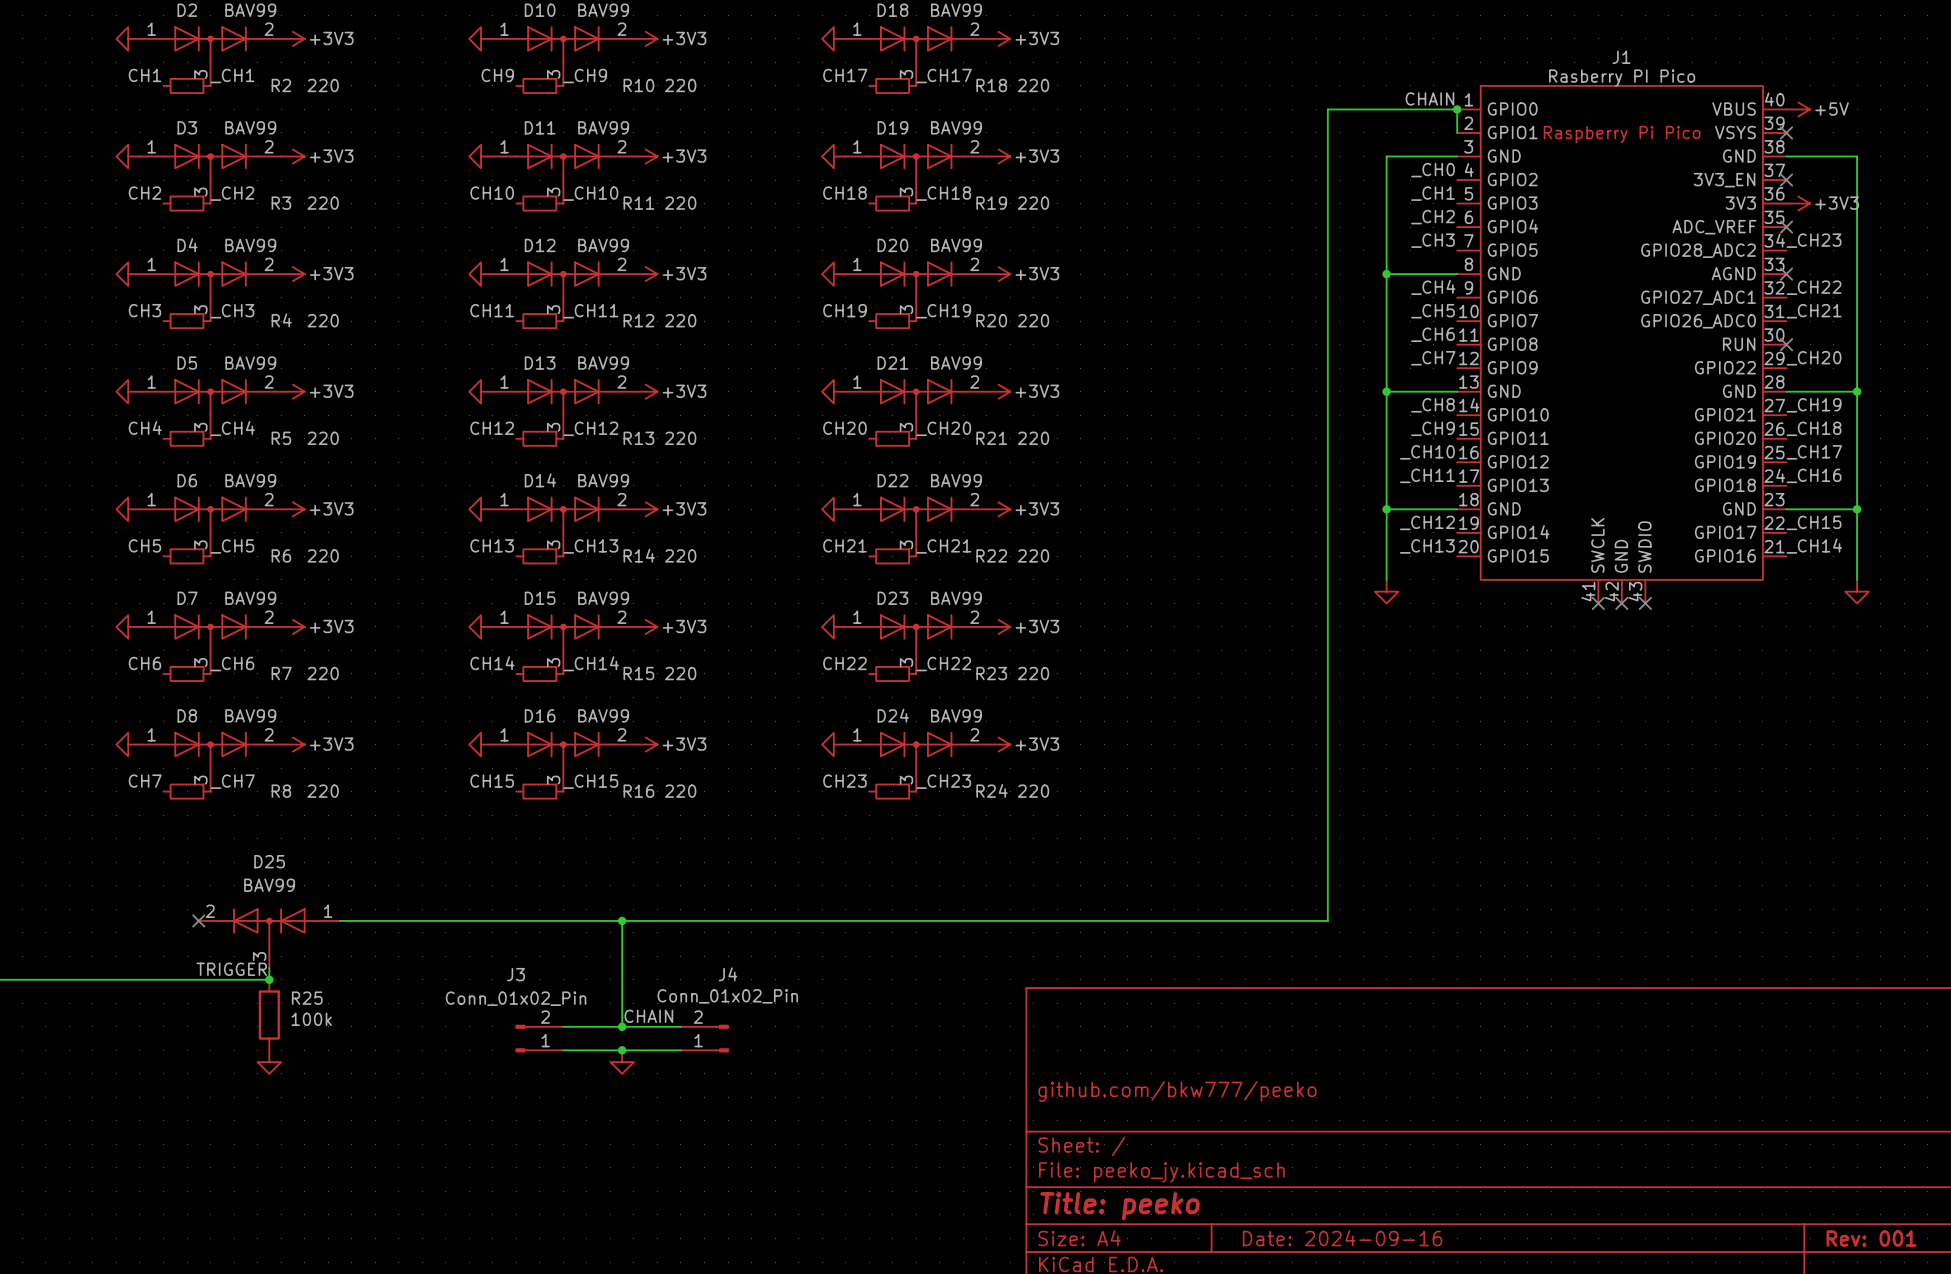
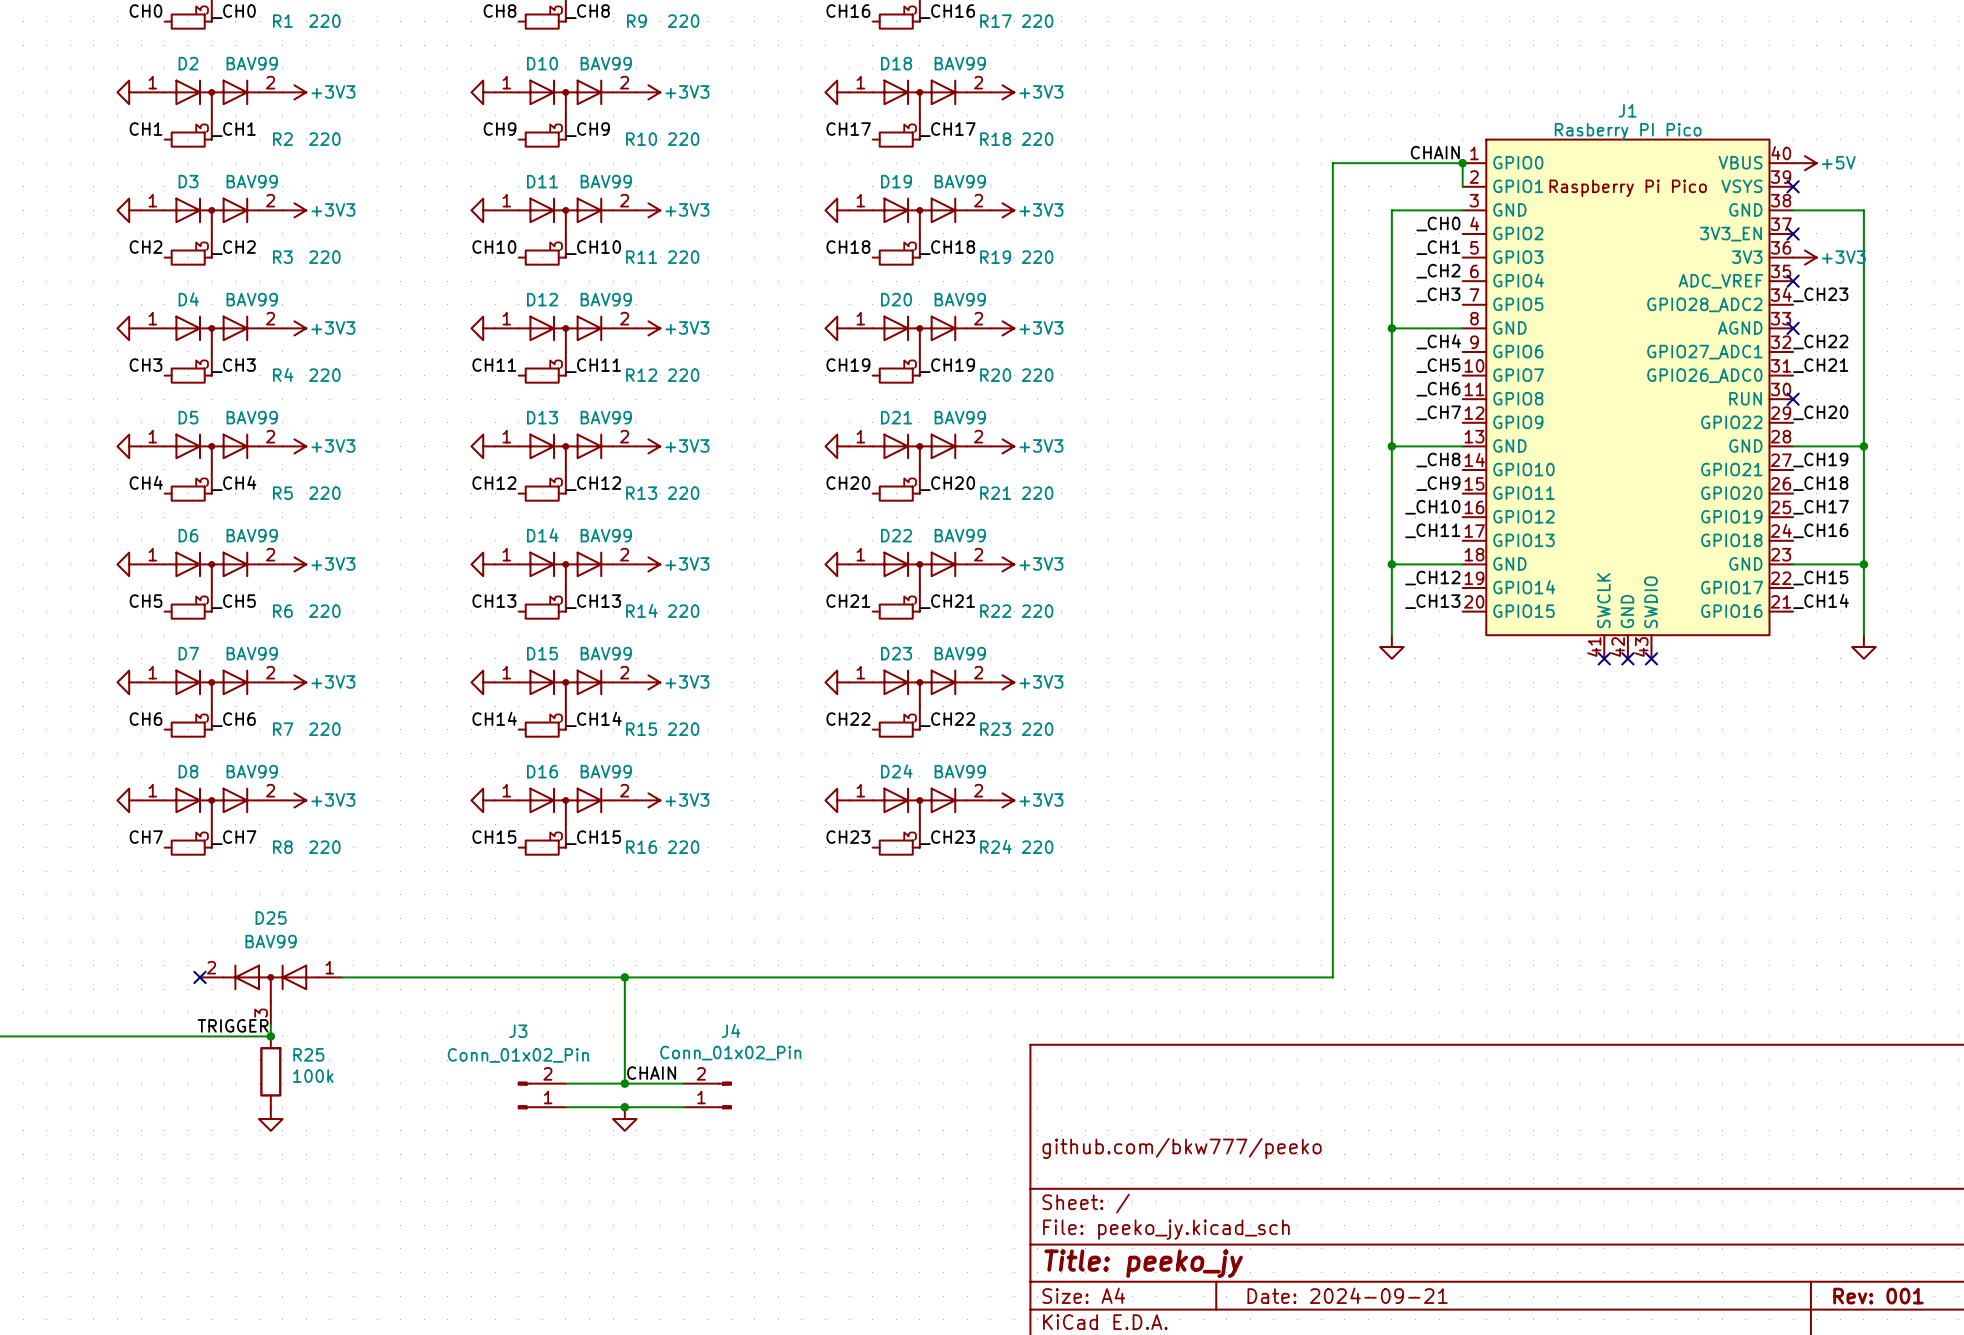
title block: Title: peeko (1120, 1206) -> Title: peeko_jy (1143, 1263)
title block: Date: 2024-09-16 (1342, 1238) -> Date: 2024-09-21 (1347, 1295)

